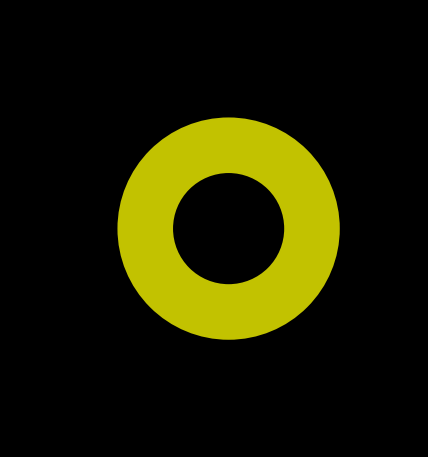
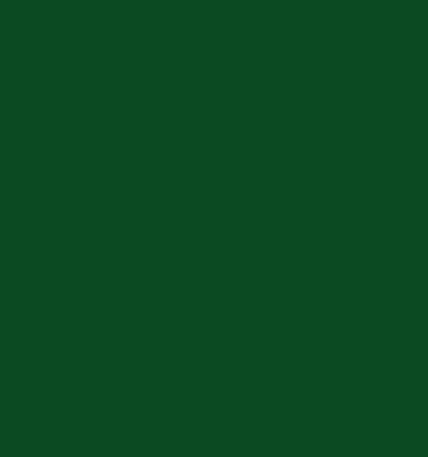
part: (228, 228) -> none

